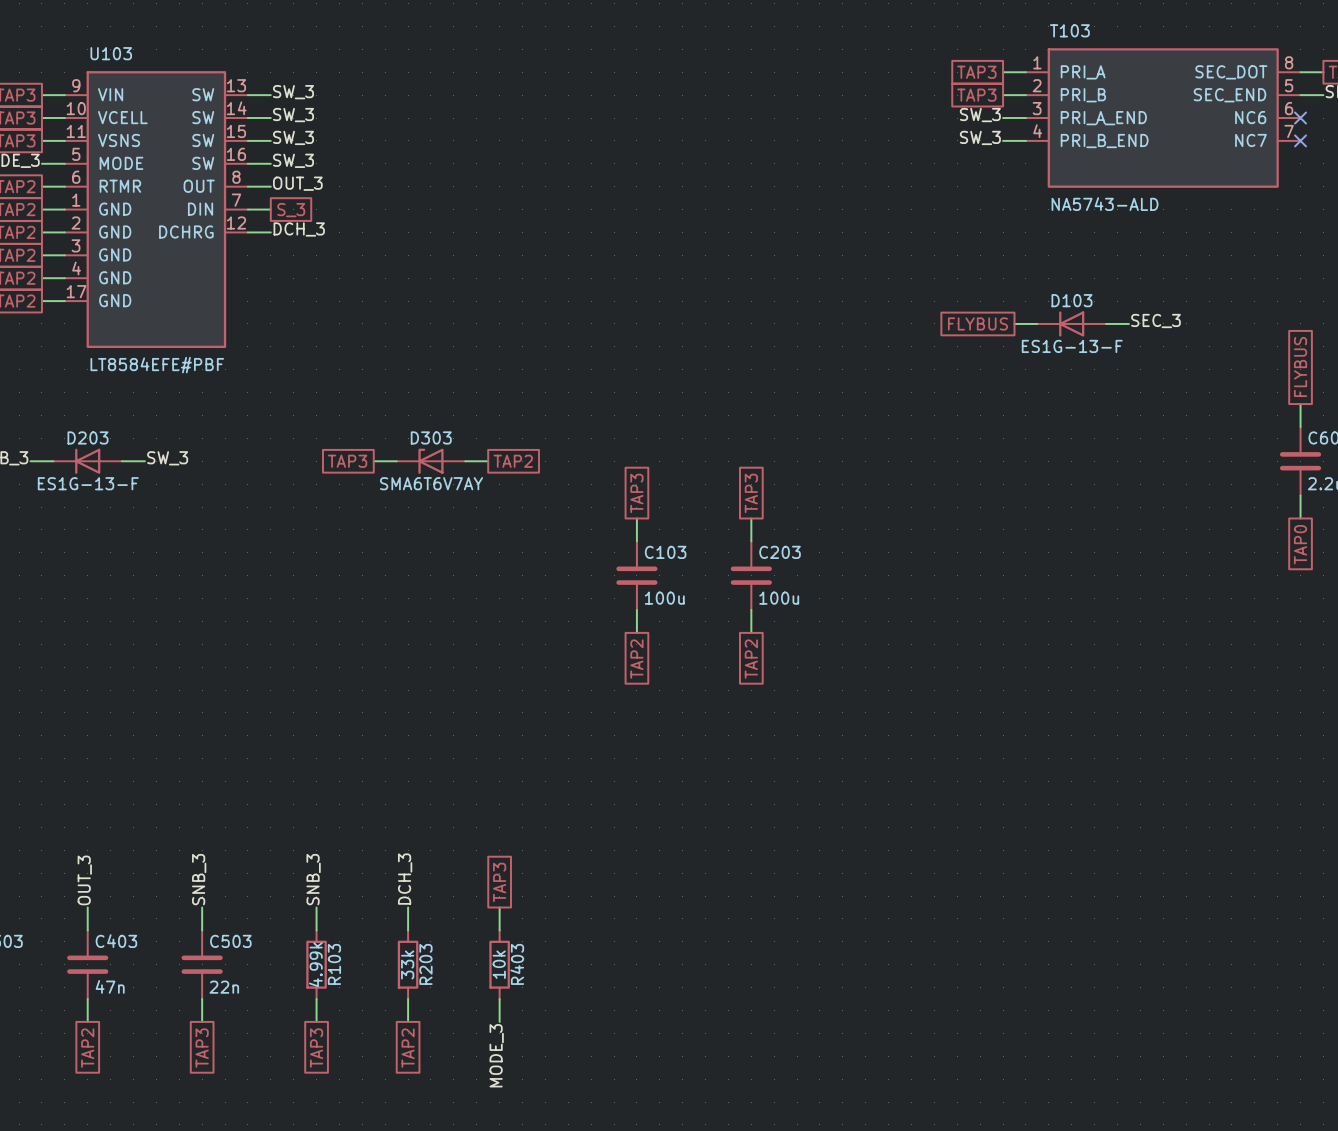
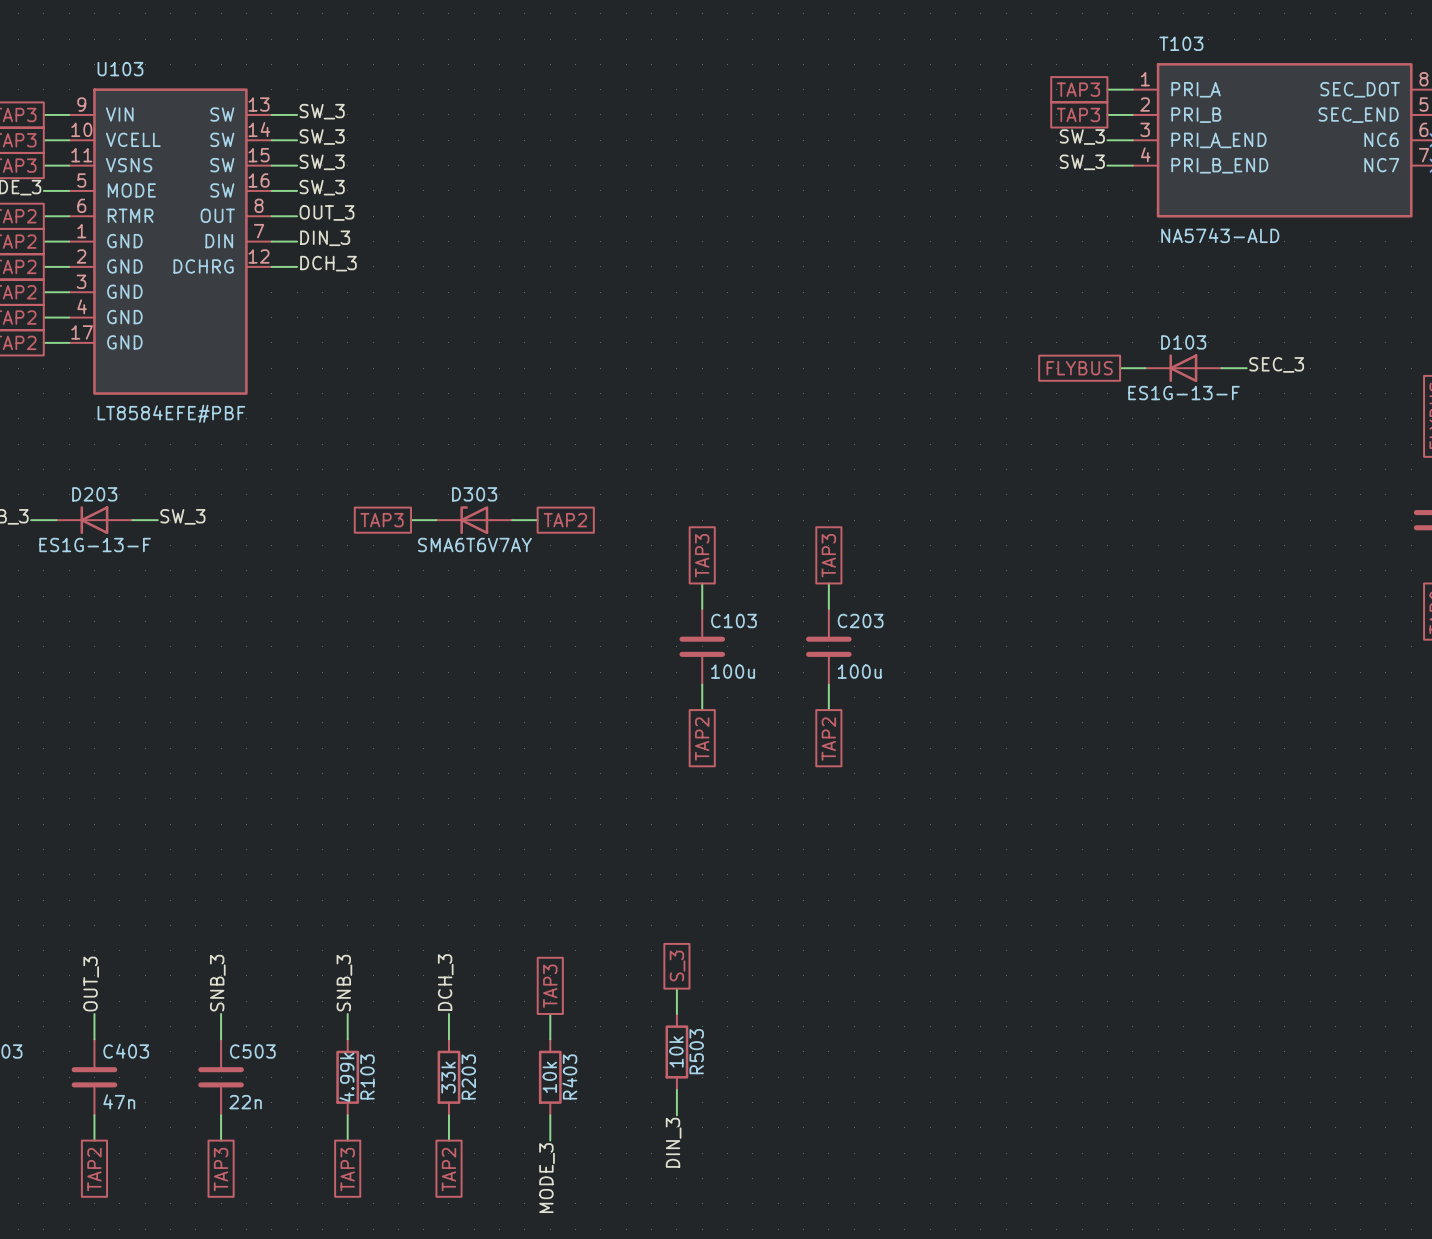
label: none -> DIN_3 (325, 238)
global label: S_3 (291, 210) -> none
global label: none -> S_3 (677, 966)
wire: none -> (676, 988) (676, 1013)
R503: none -> 10k (676, 1051)
wire: none -> (676, 1089) (676, 1115)
label: none -> DIN_3 (673, 1142)

